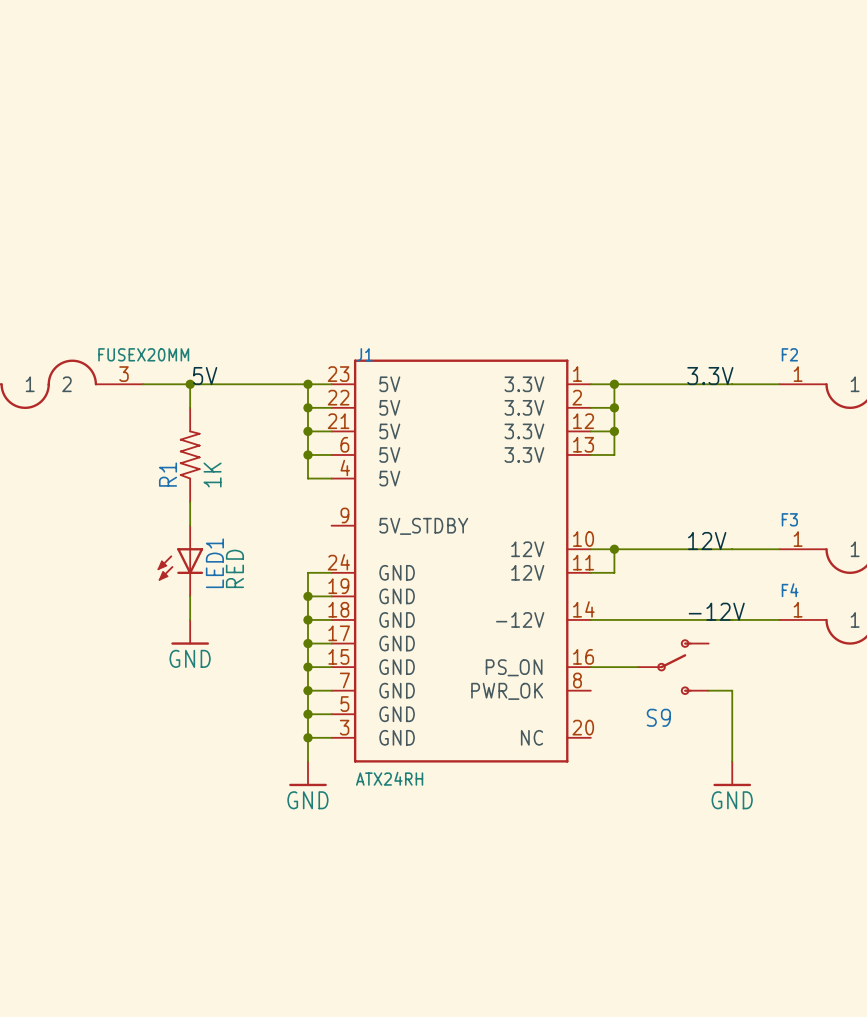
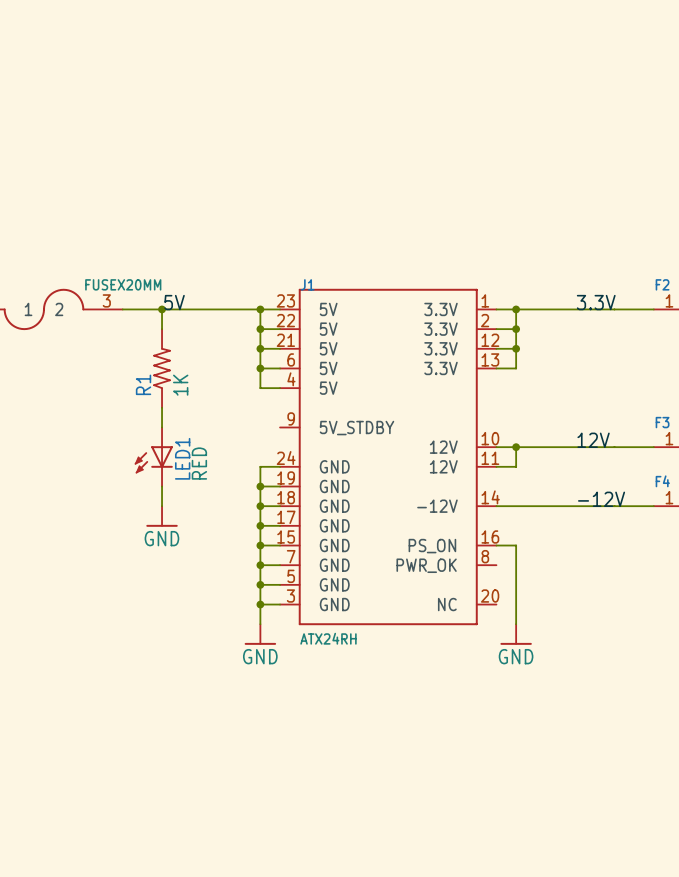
wire: (614, 667) (637, 667) -> (516, 545) (516, 624)
S9: (673, 667) -> none
wire: (708, 690) (732, 690) (732, 761) -> none
power symbol position: GND (732, 773) -> GND (516, 634)

